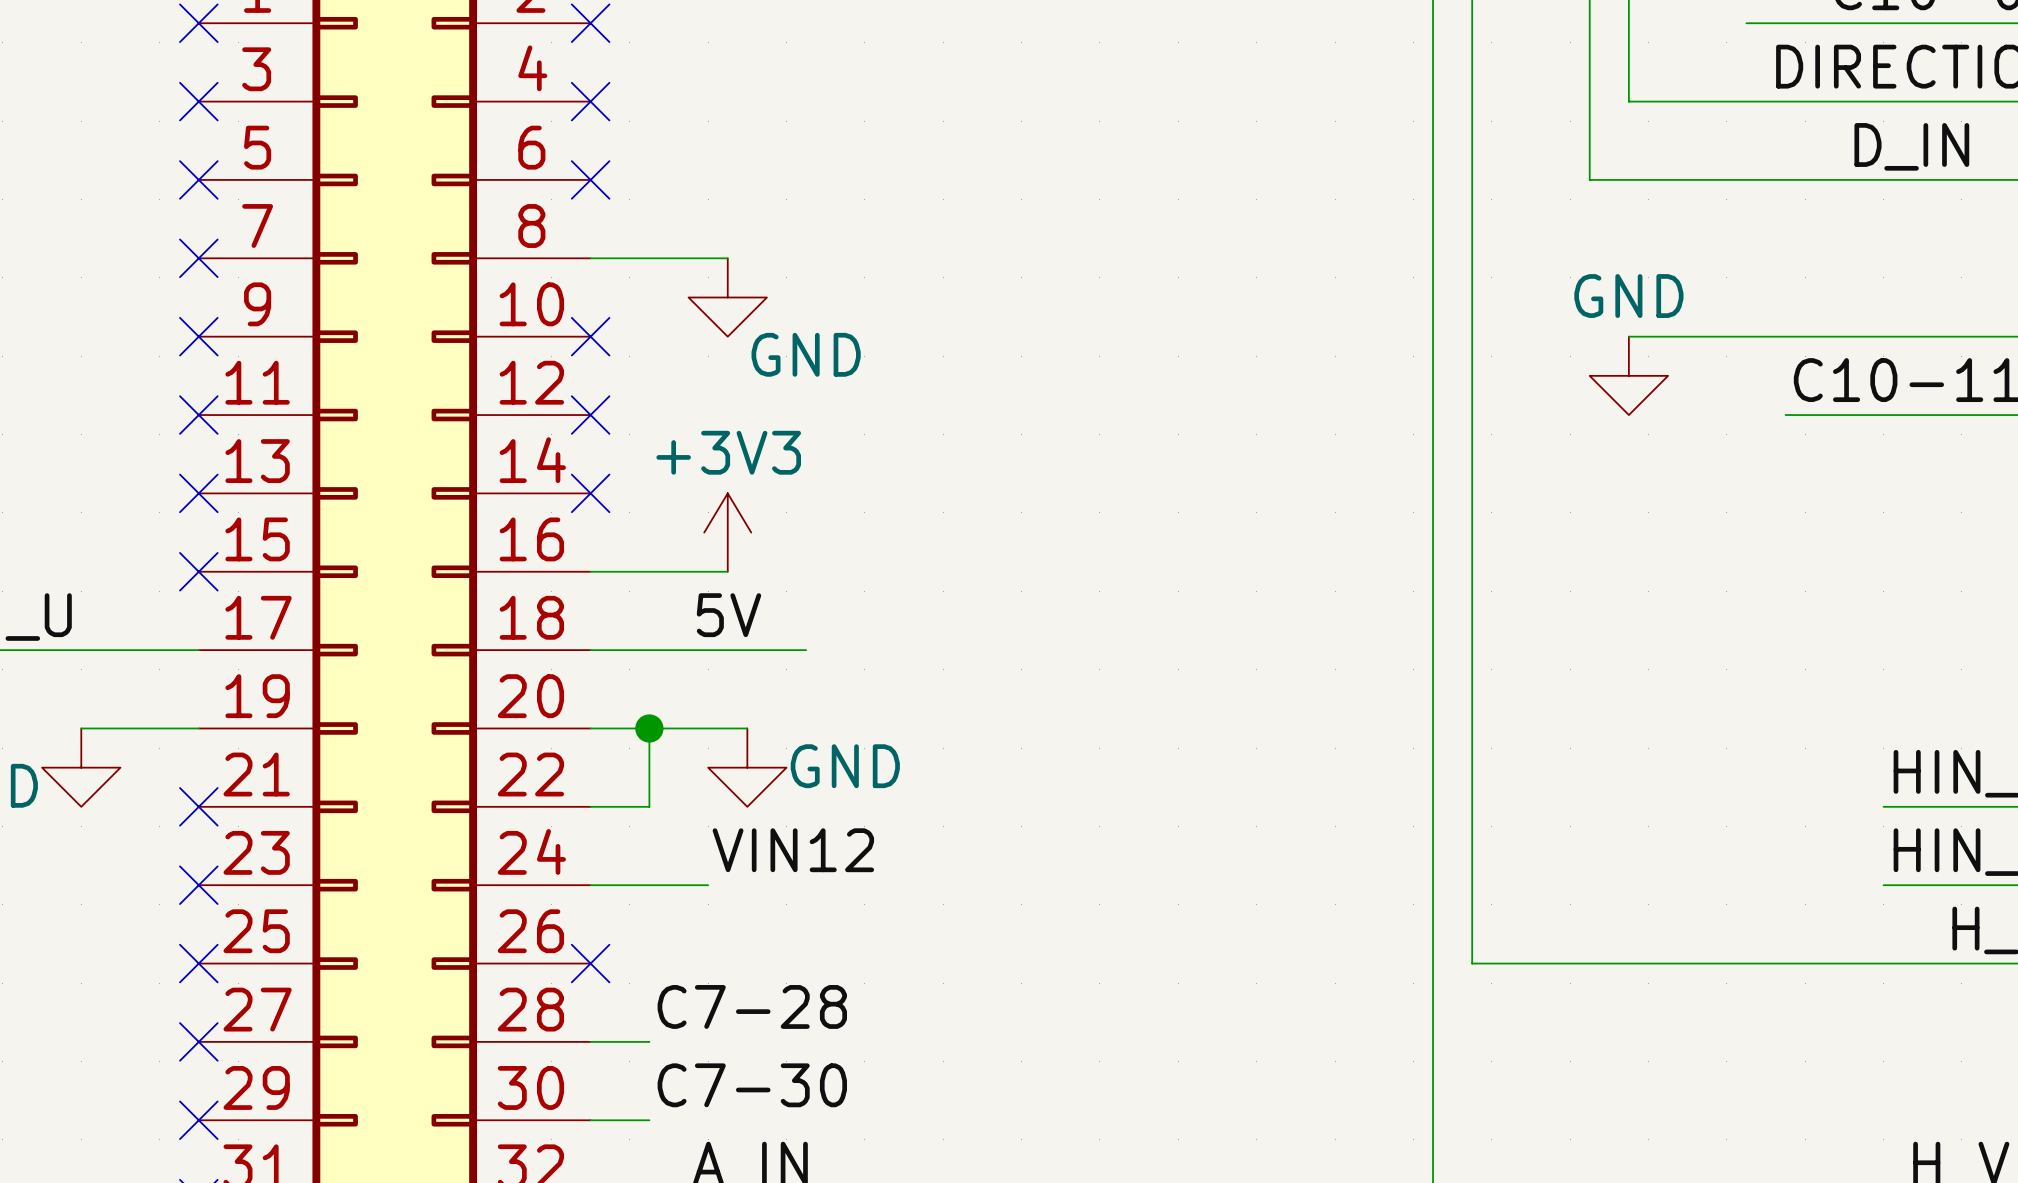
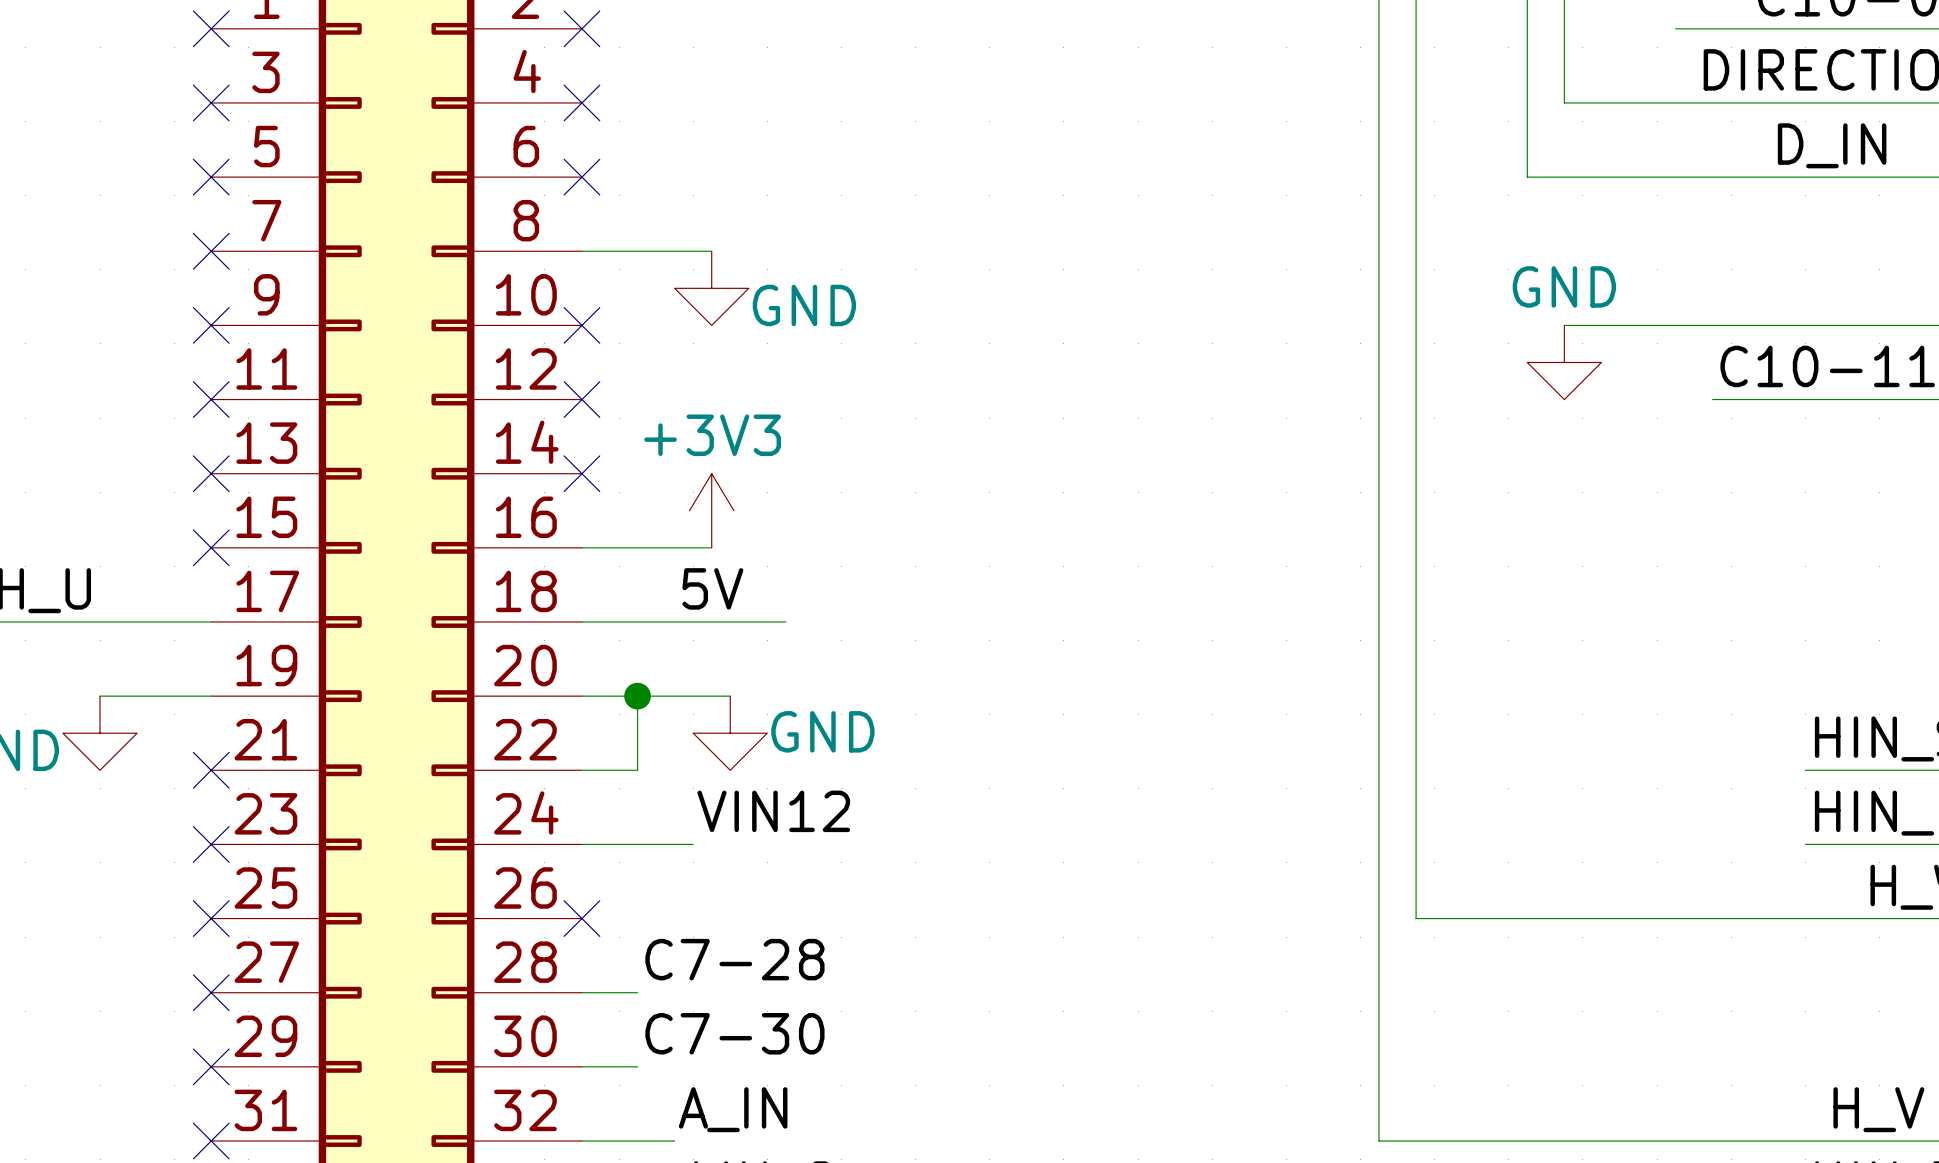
power symbol text position: GND (806, 354) -> GND (804, 305)

